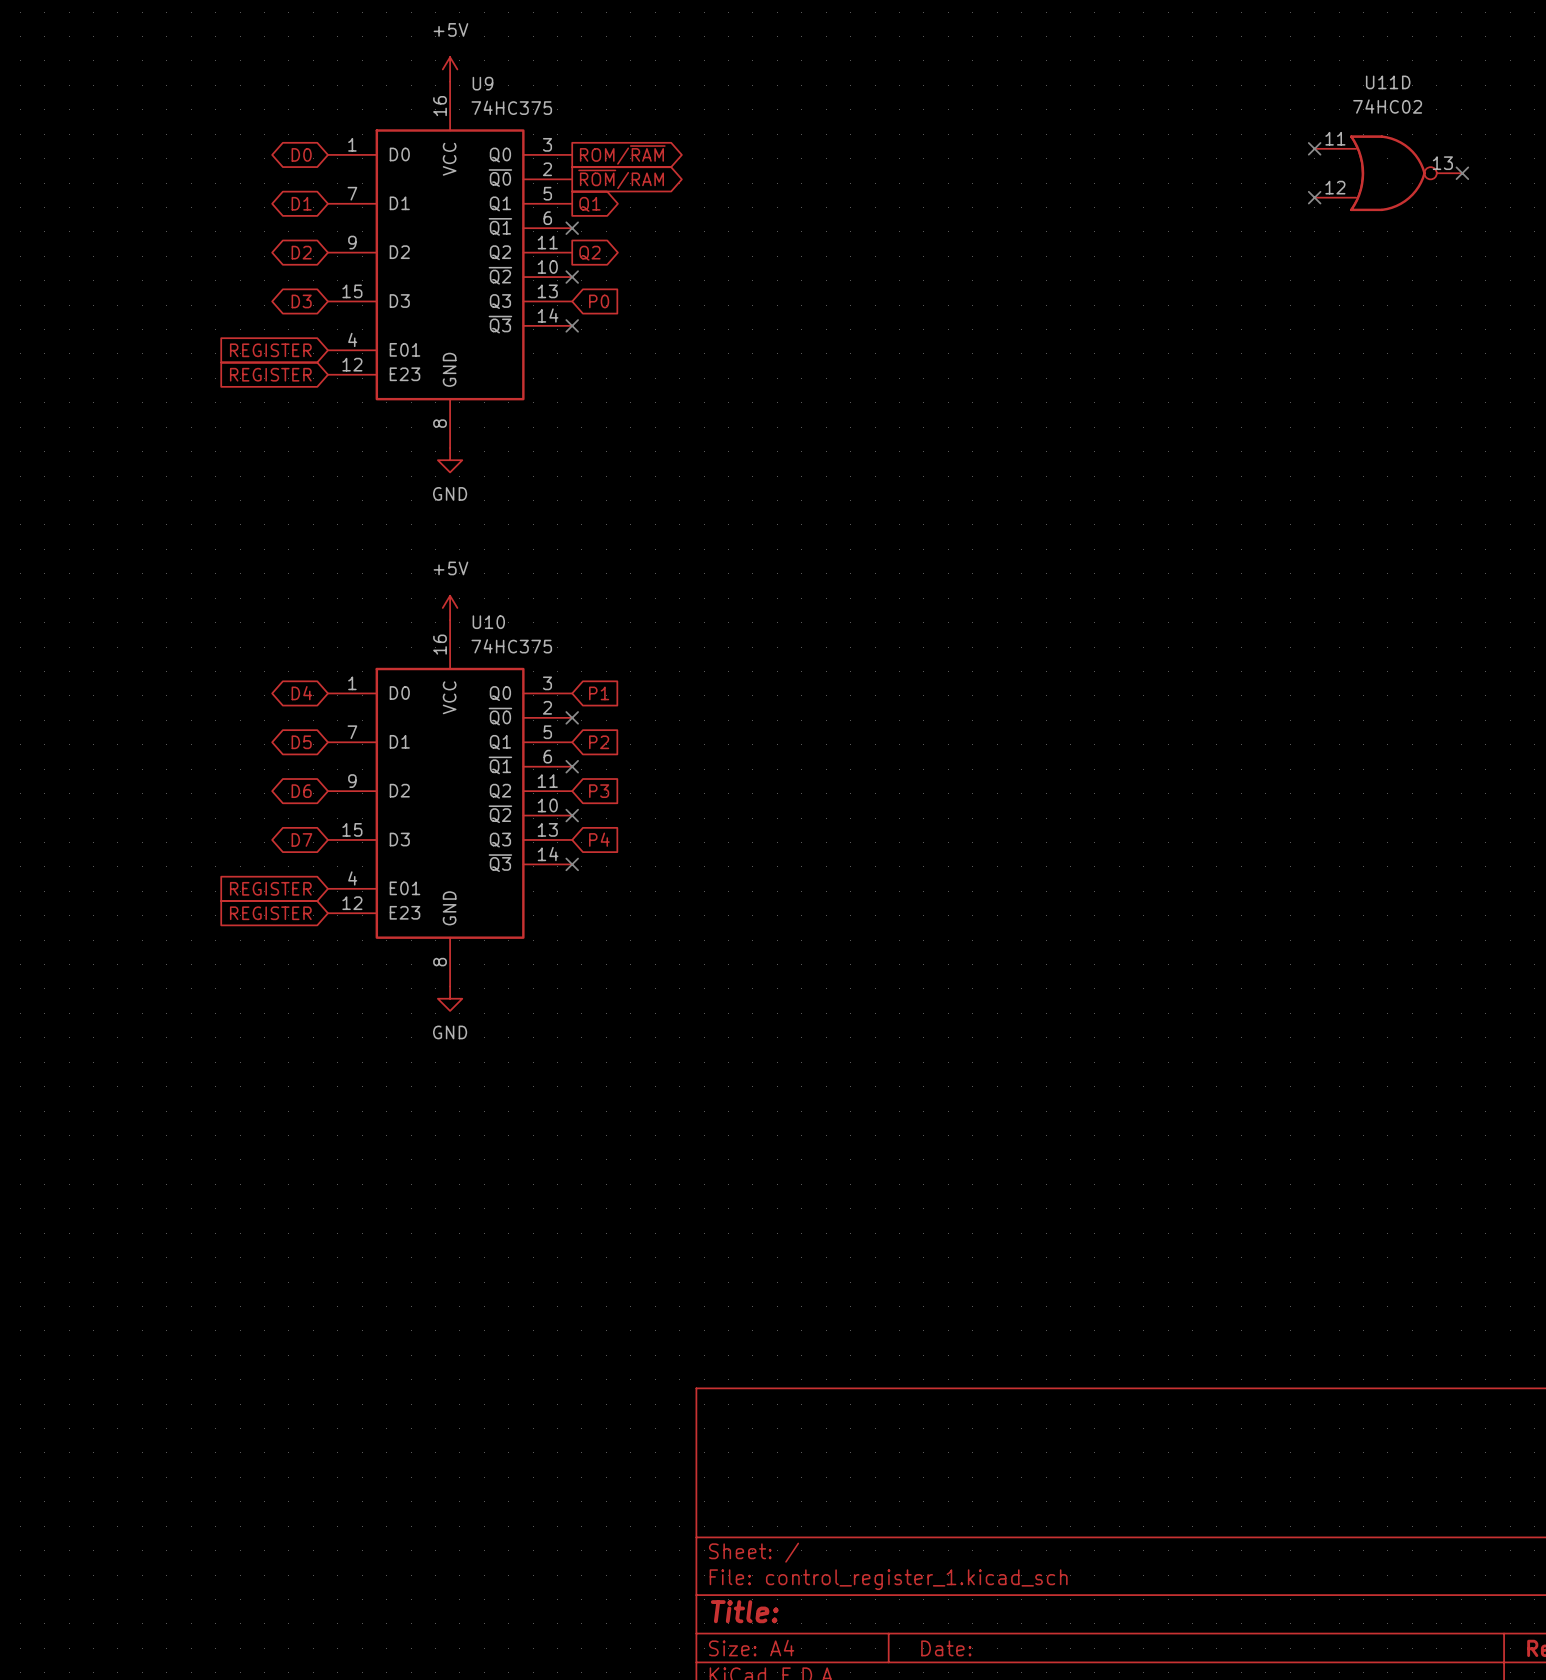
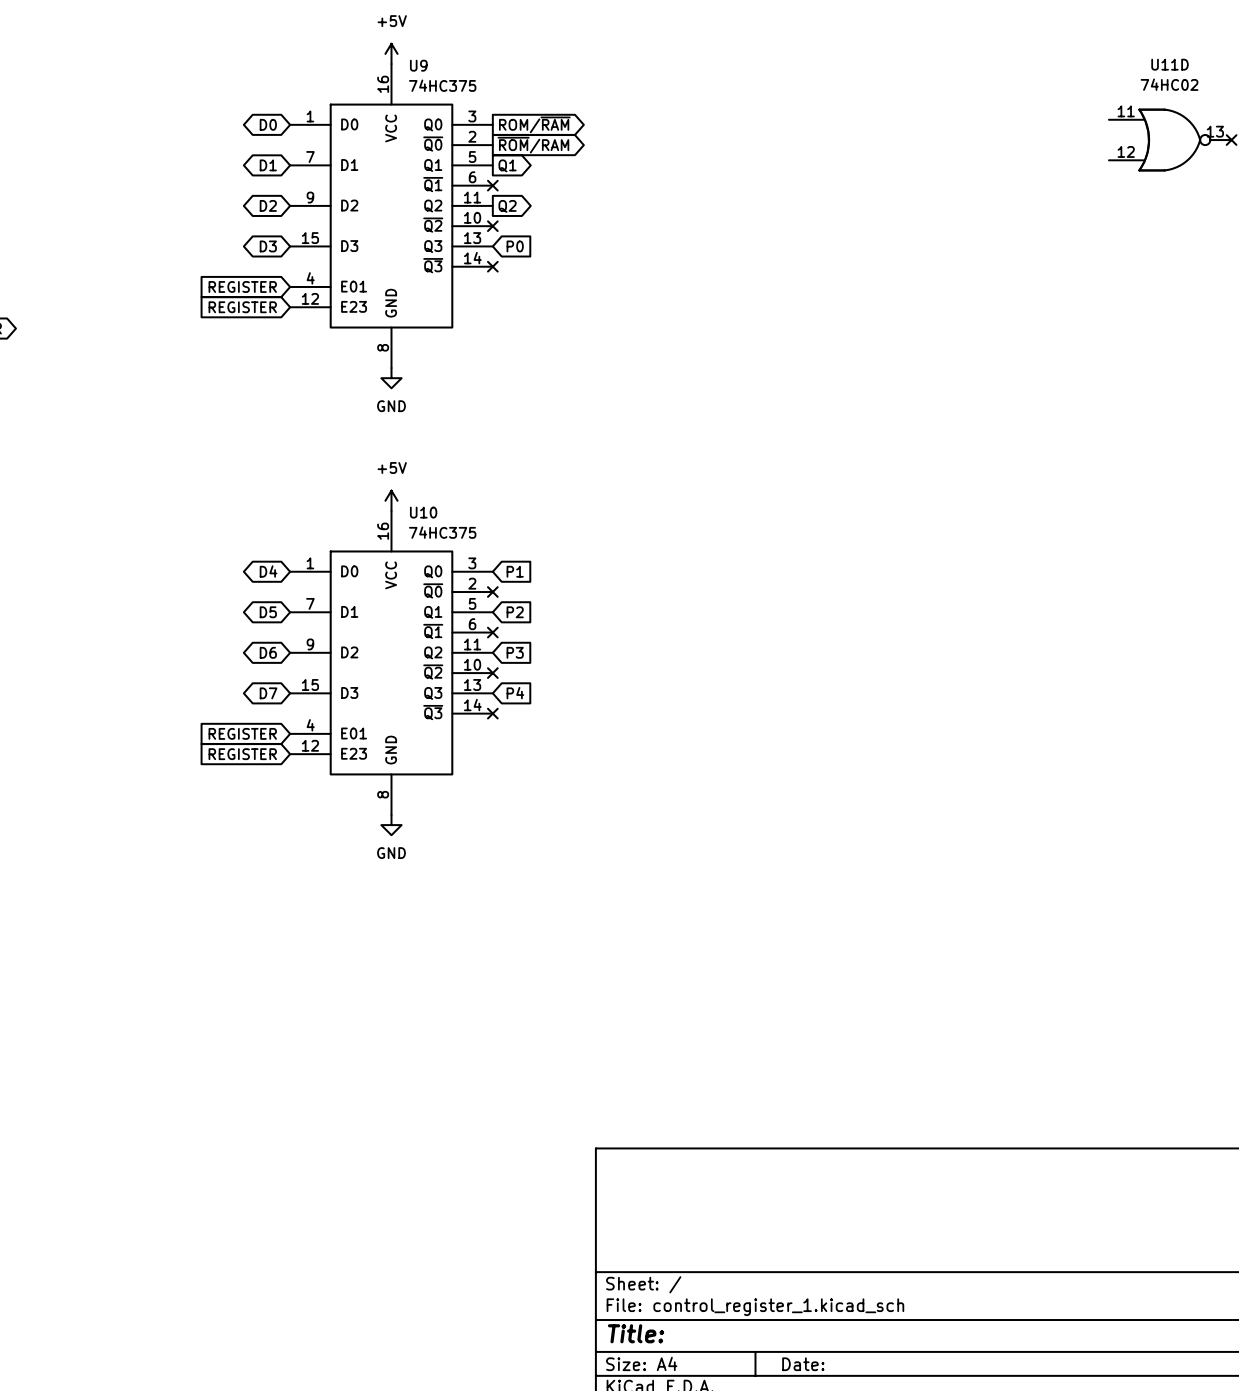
no-connect mark: (1314, 148) -> none
no-connect mark: (1314, 197) -> none

